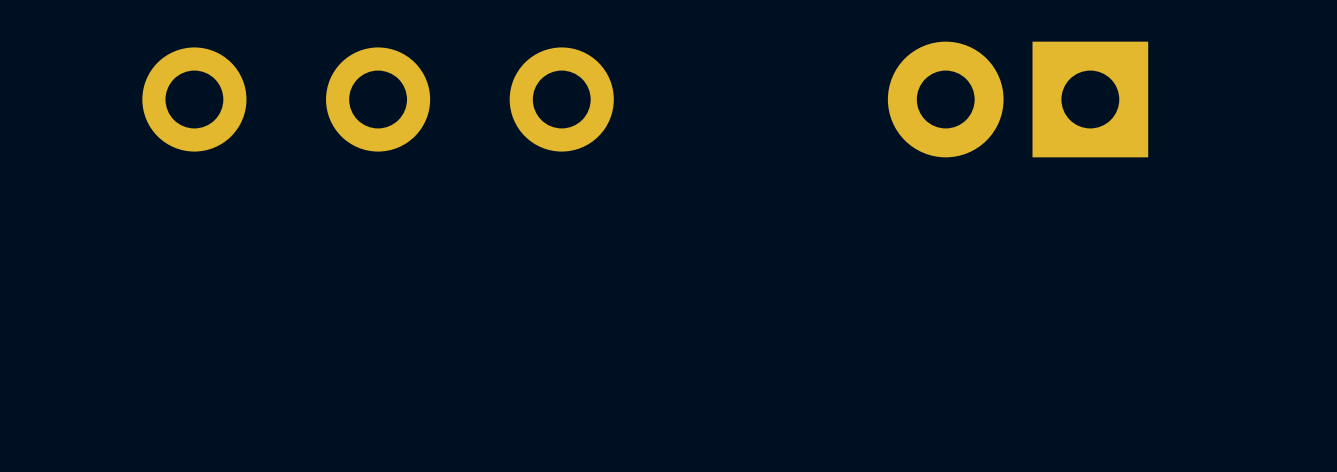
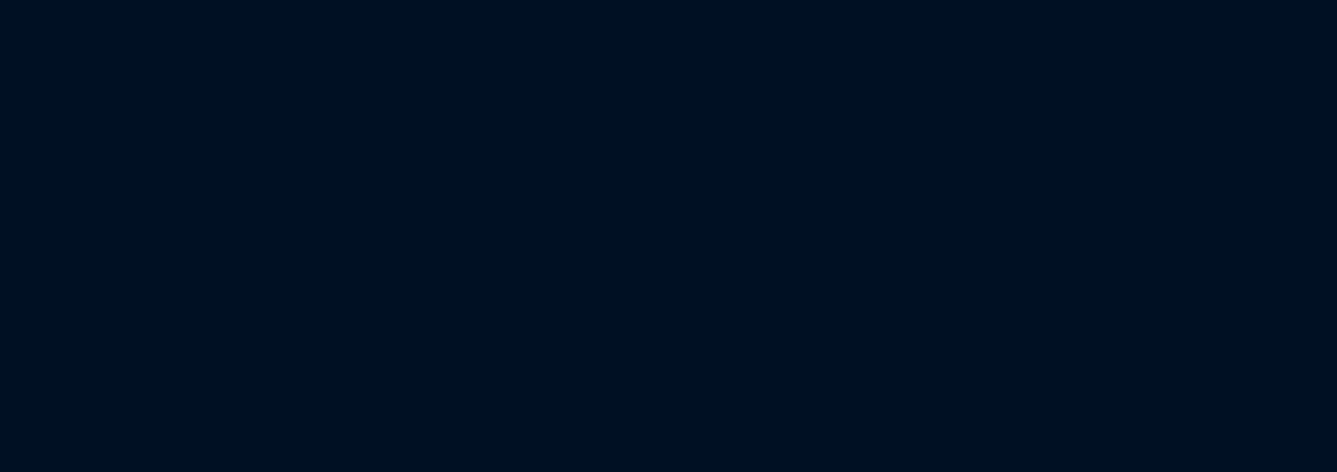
part: (378, 99) -> none
part: (1018, 99) -> none

